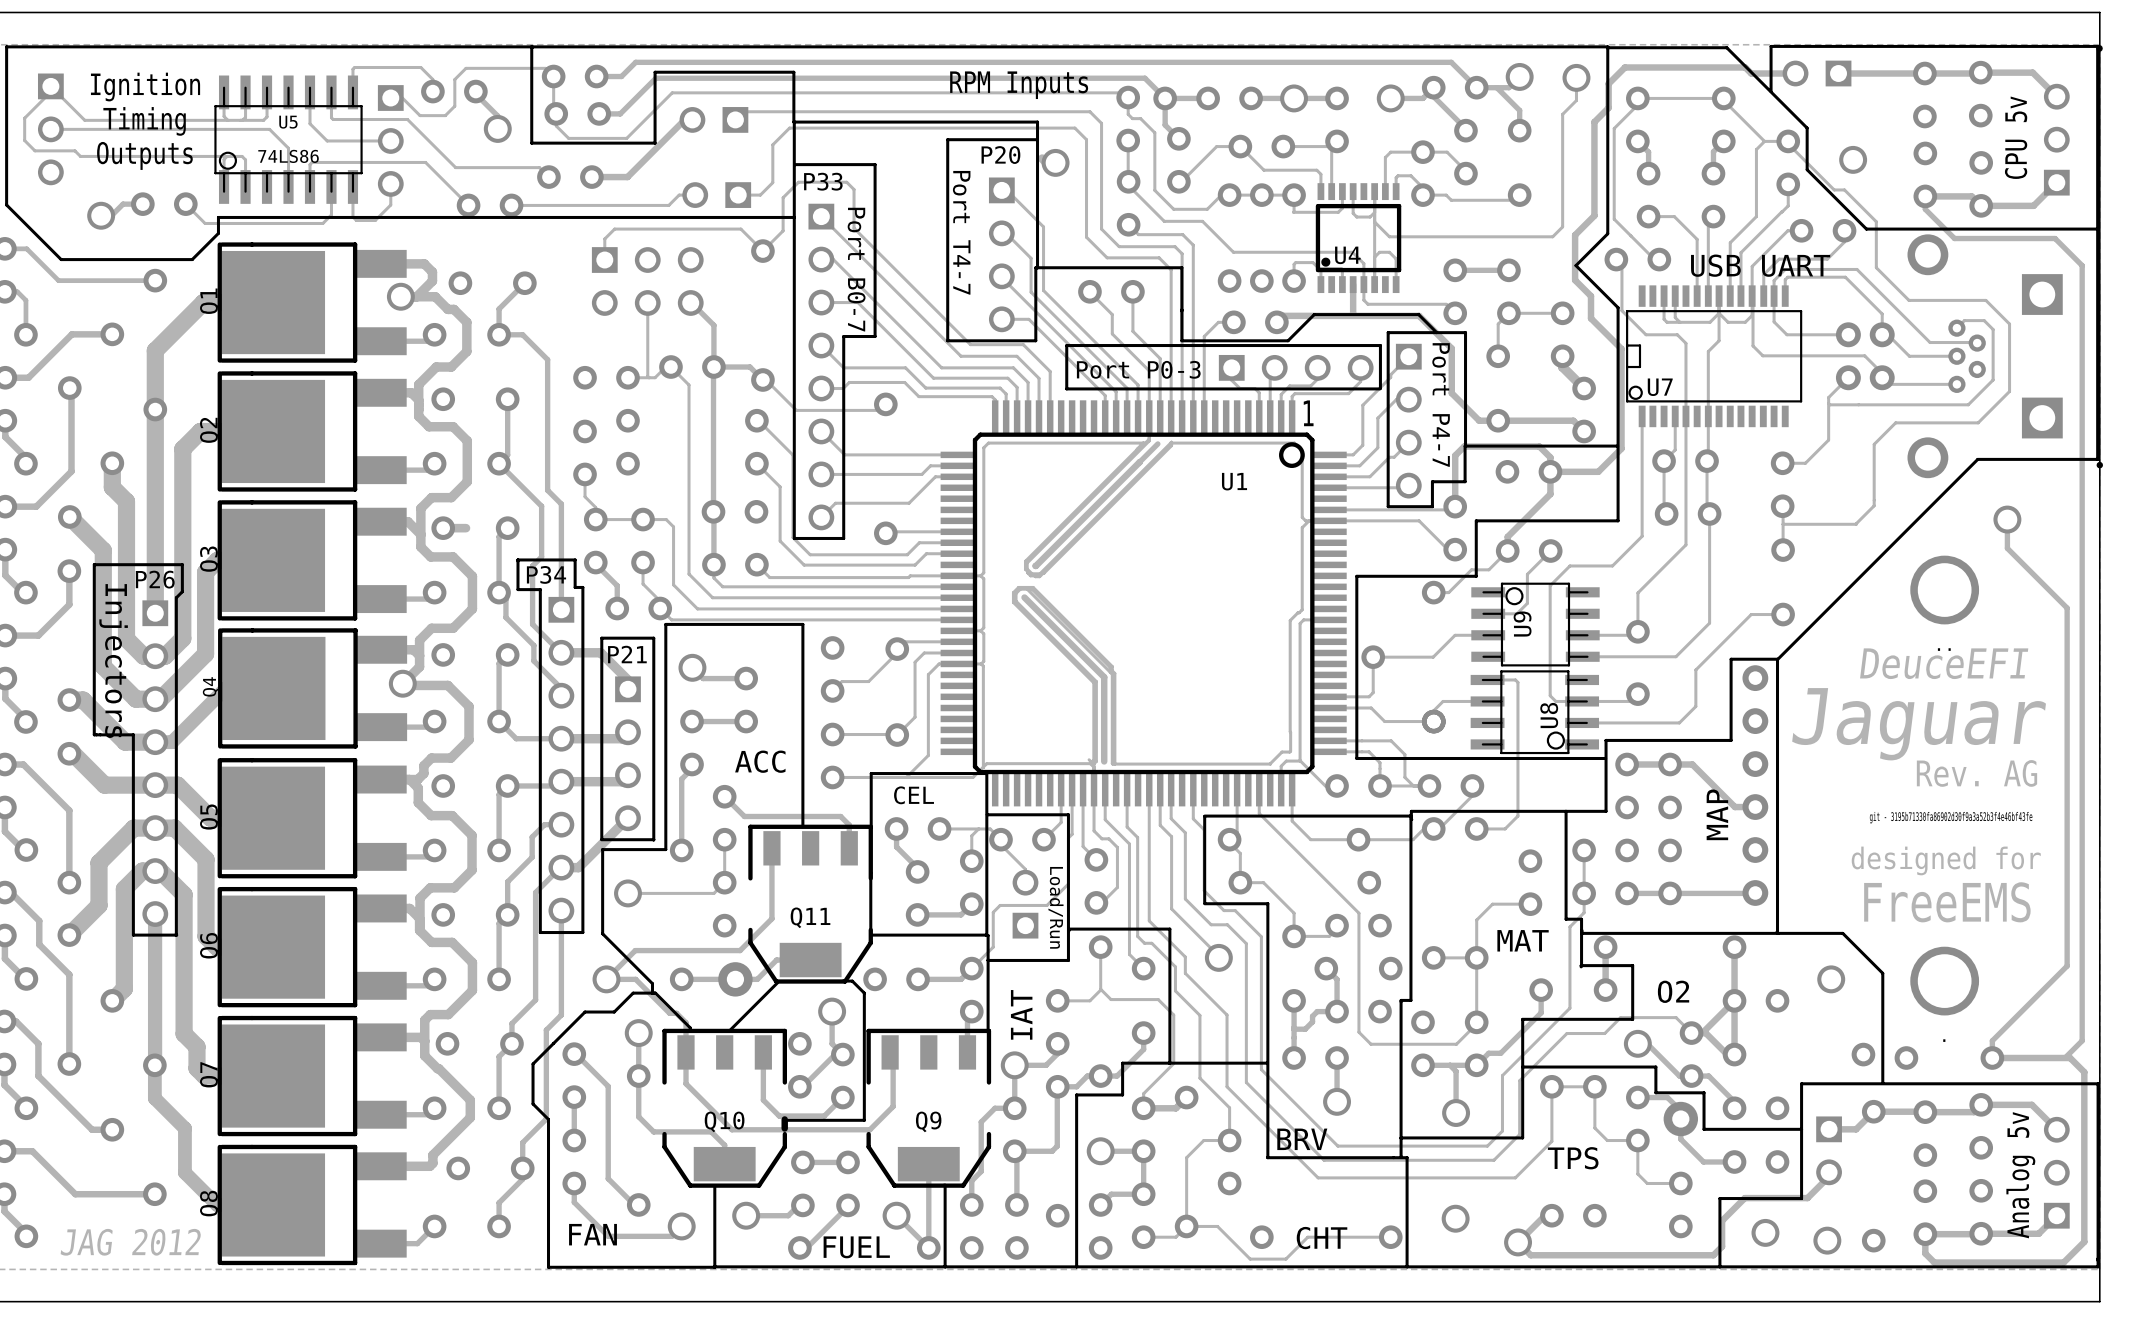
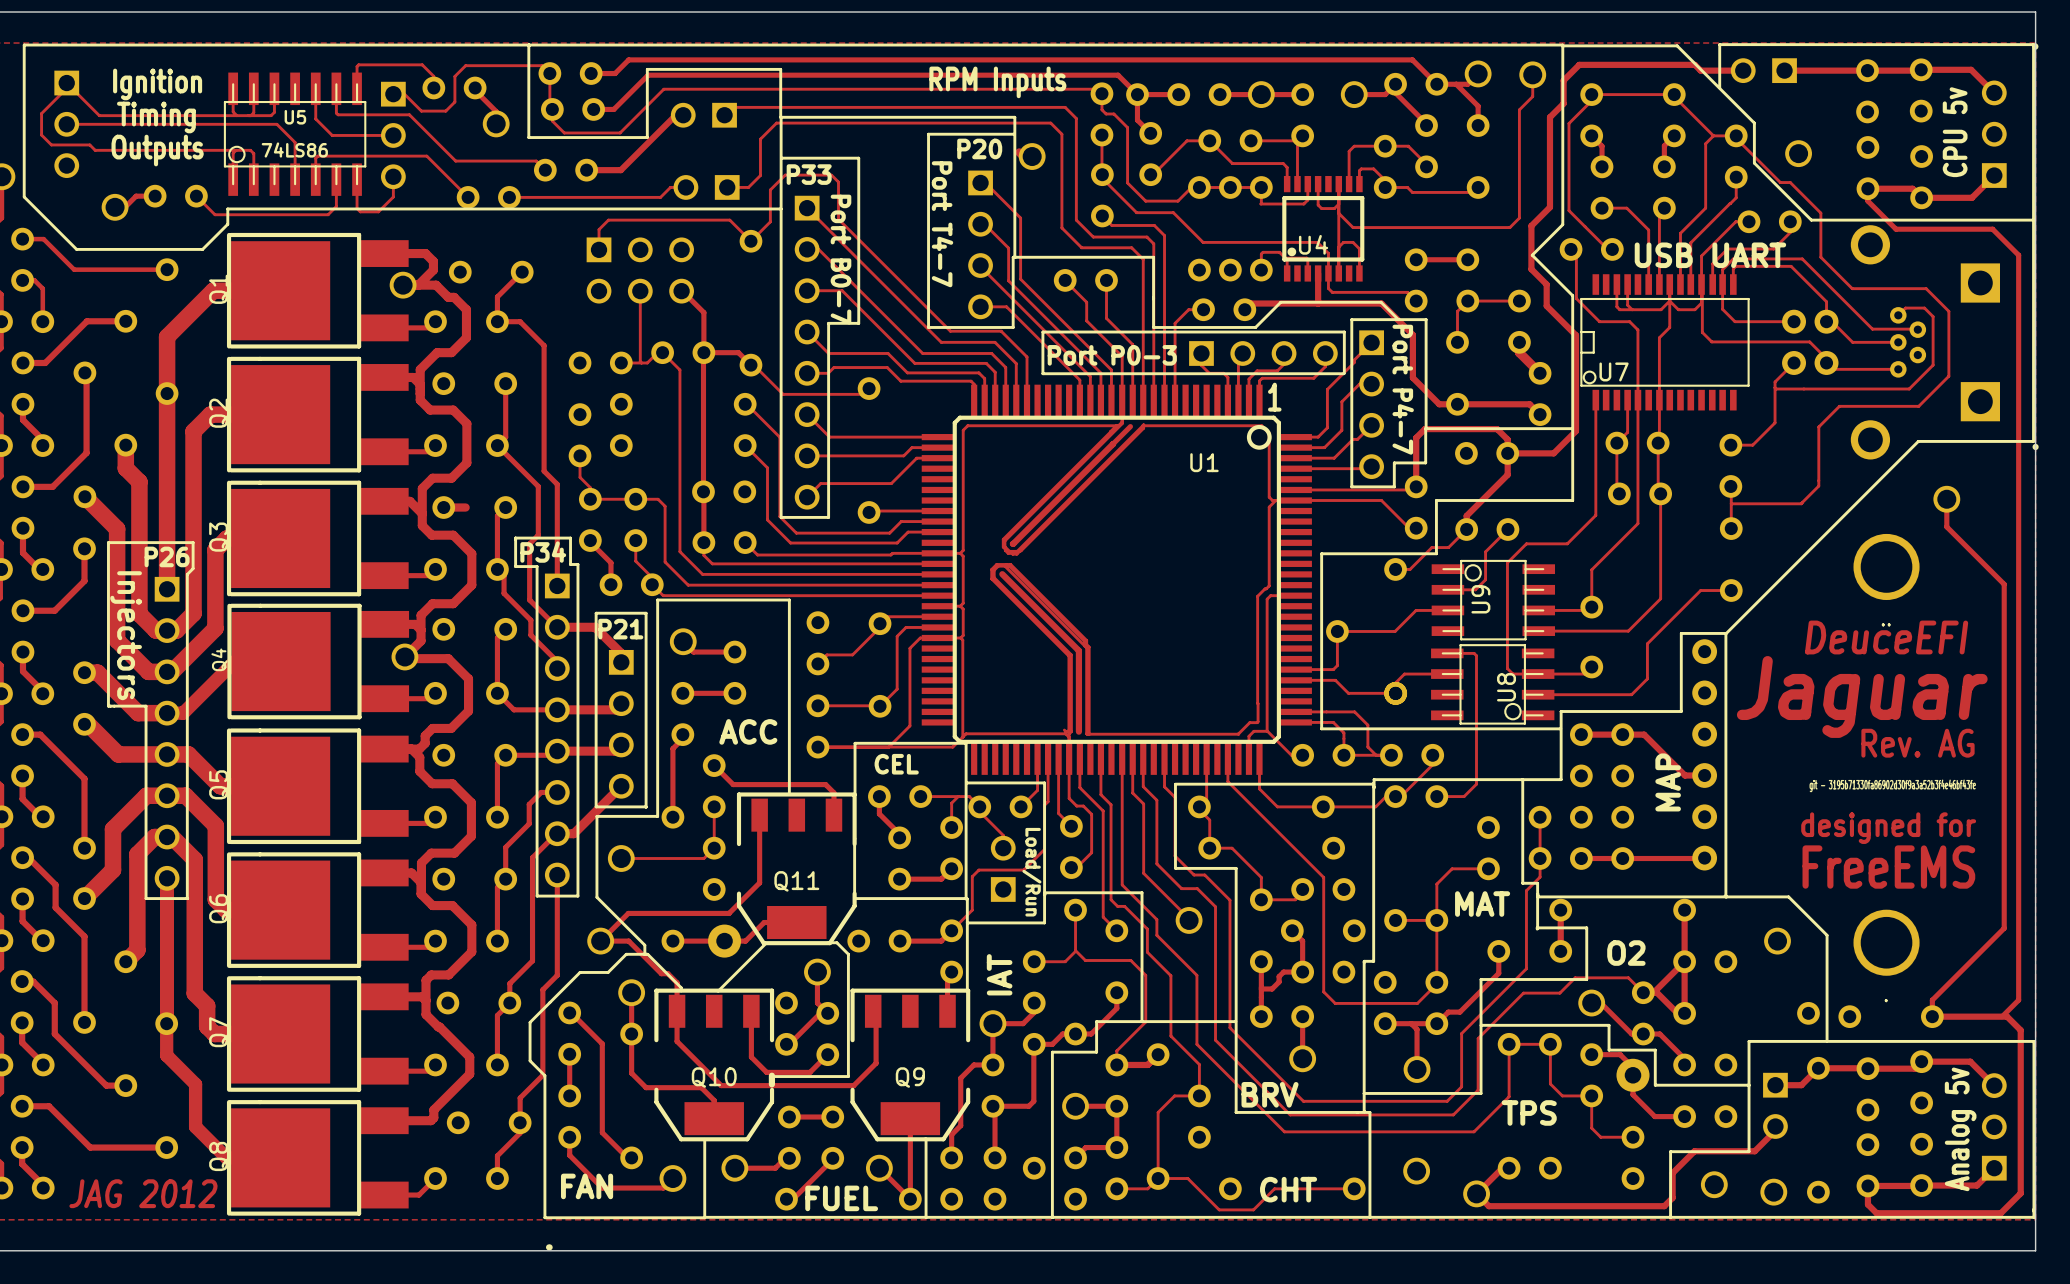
line: none -> (549, 1247) (549, 1247)

